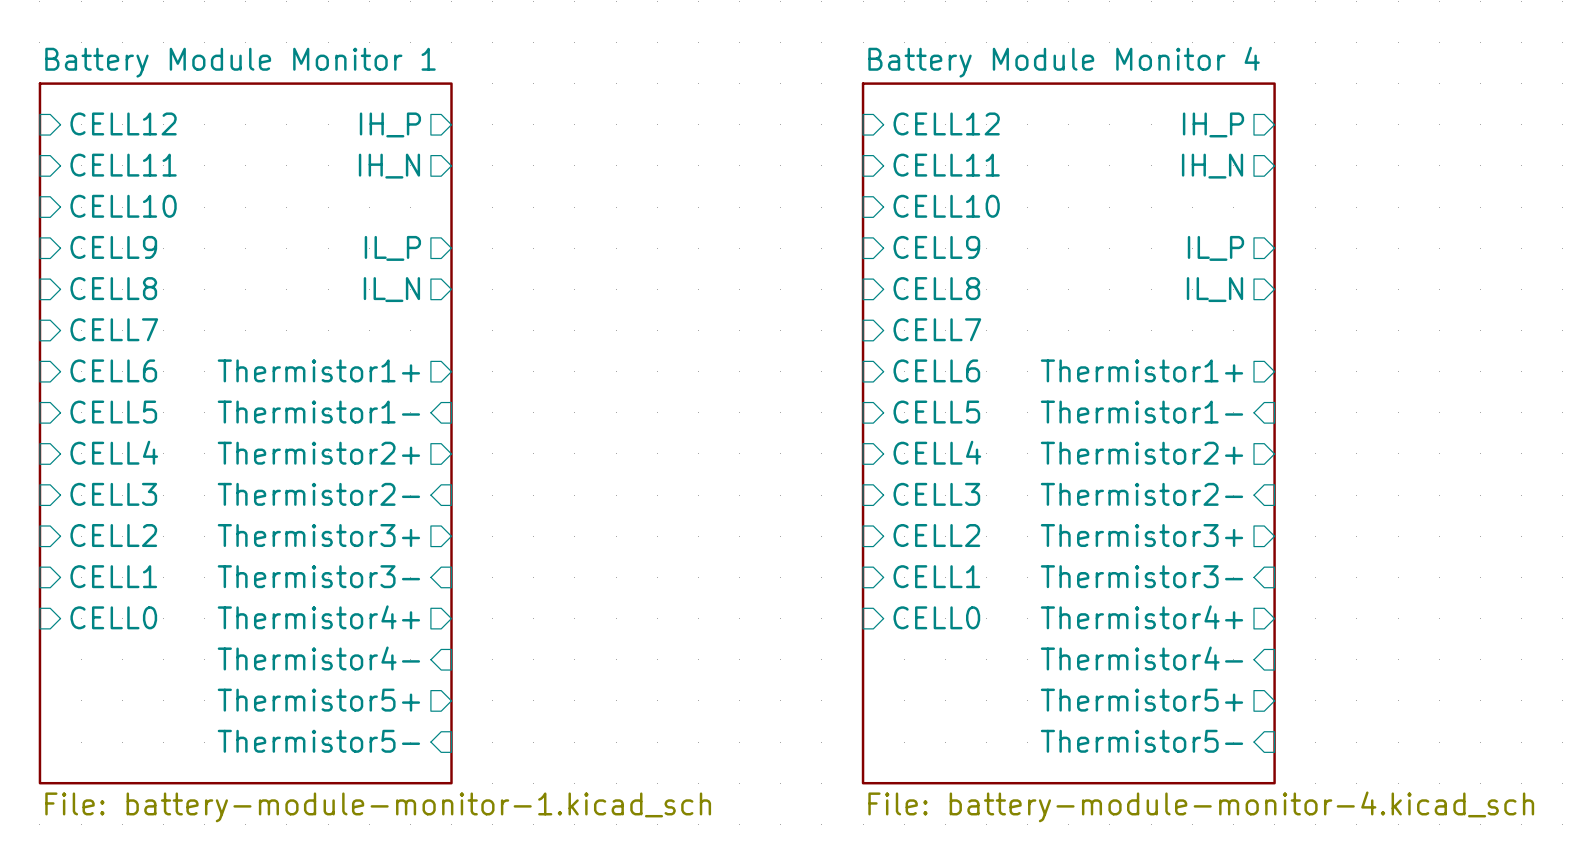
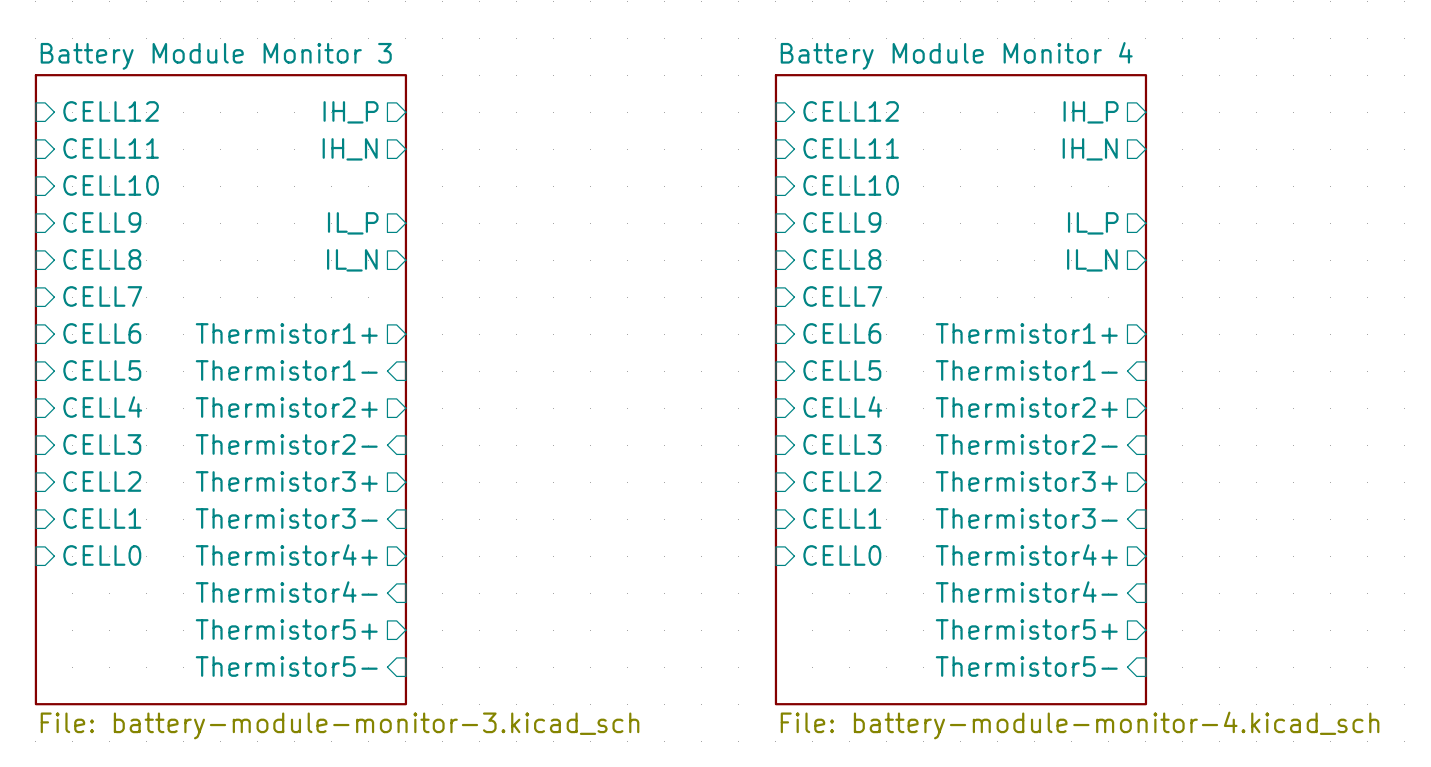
sheet Battery Module Monitor 1 name: Battery Module Monitor 1 (240, 62) -> Battery Module Monitor 3 (216, 56)
sheet Battery Module Monitor 1 value: File: battery-module-monitor-1.kicad_sch (378, 807) -> File: battery-module-monitor-3.kicad_sch (340, 725)

